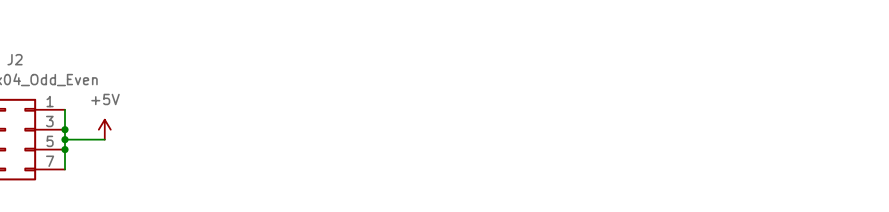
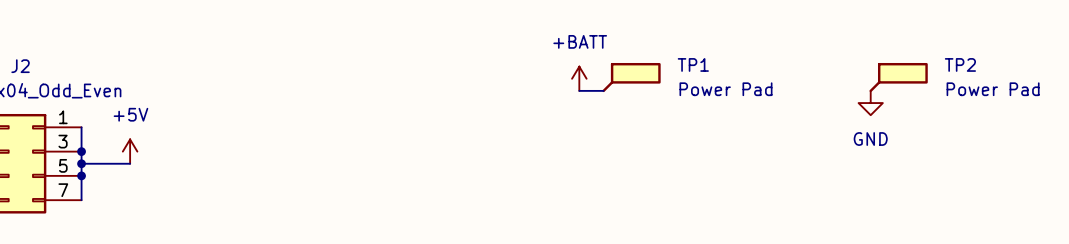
TP1: none -> Power Pad (631, 77)
TP2: none -> Power Pad (898, 77)
power symbol: none -> +BATT (579, 78)
wire: none -> (579, 90) (603, 90)
power symbol: none -> GND (870, 103)

